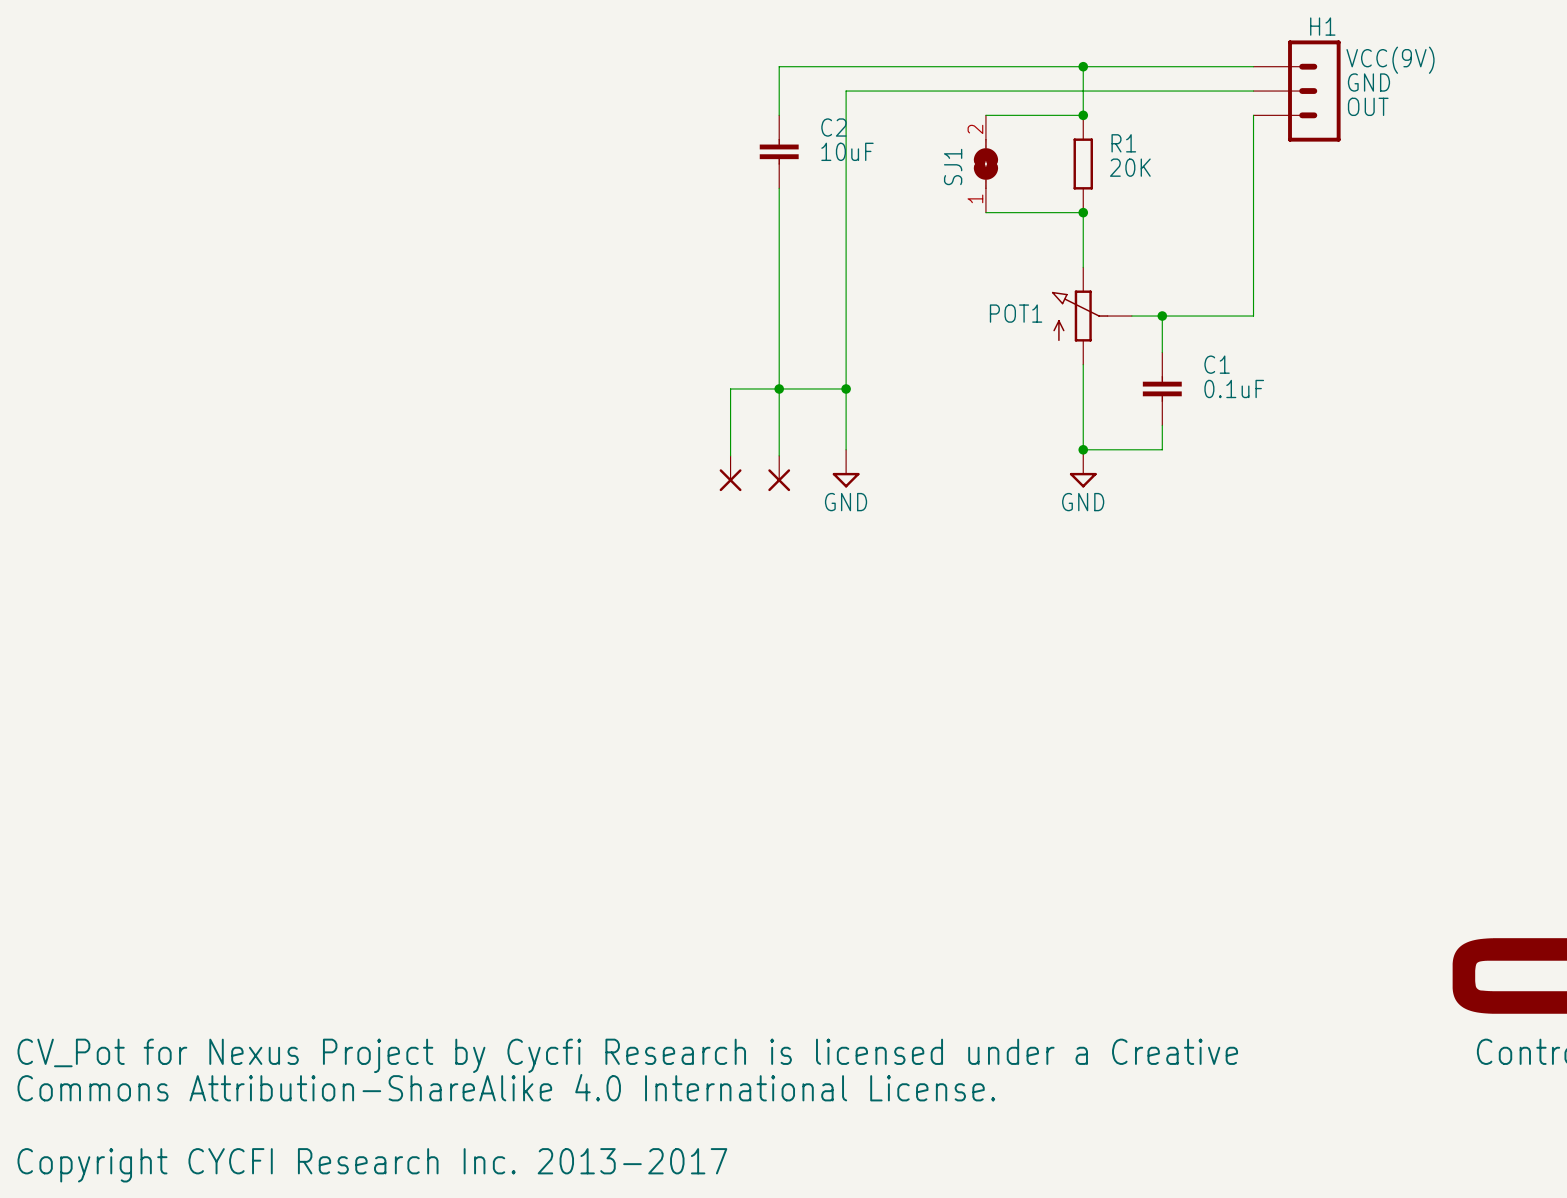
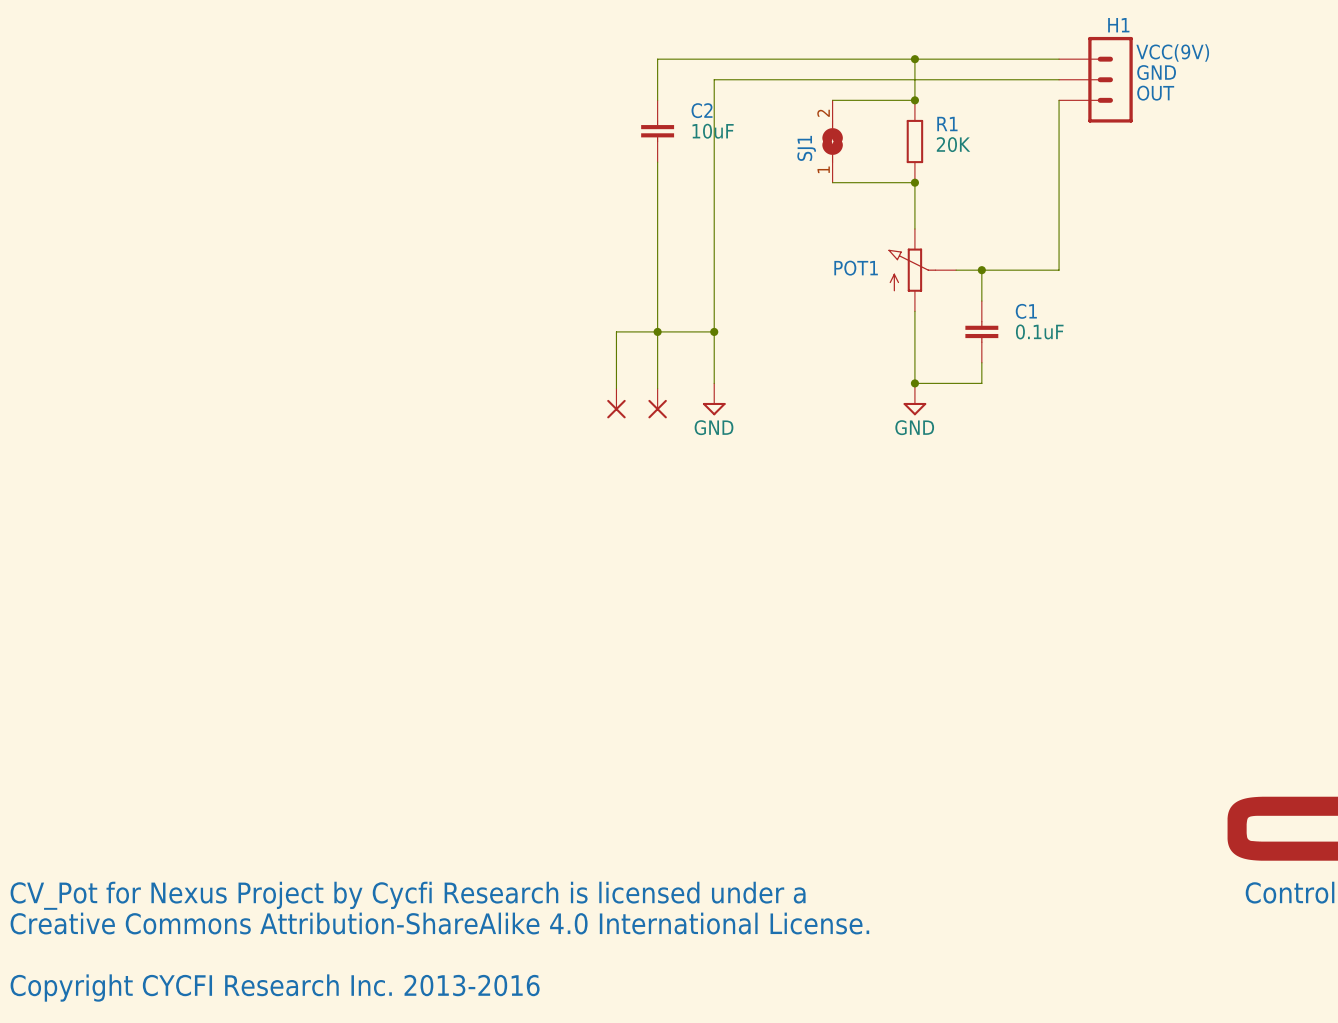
text: CV_Pot for Nexus Project by Cycfi Research is licensed under a Creative (627, 1055) -> CV_Pot for Nexus Project by Cycfi Research is licensed under a (408, 895)
text: Commons Attribution-ShareAlike 4.0 International License. (506, 1087) -> Creative Commons Attribution-ShareAlike 4.0 International License. (439, 923)
text: Copyright CYCFI Research Inc. 2013-2017 (372, 1165) -> Copyright CYCFI Research Inc. 2013-2016 (275, 988)

